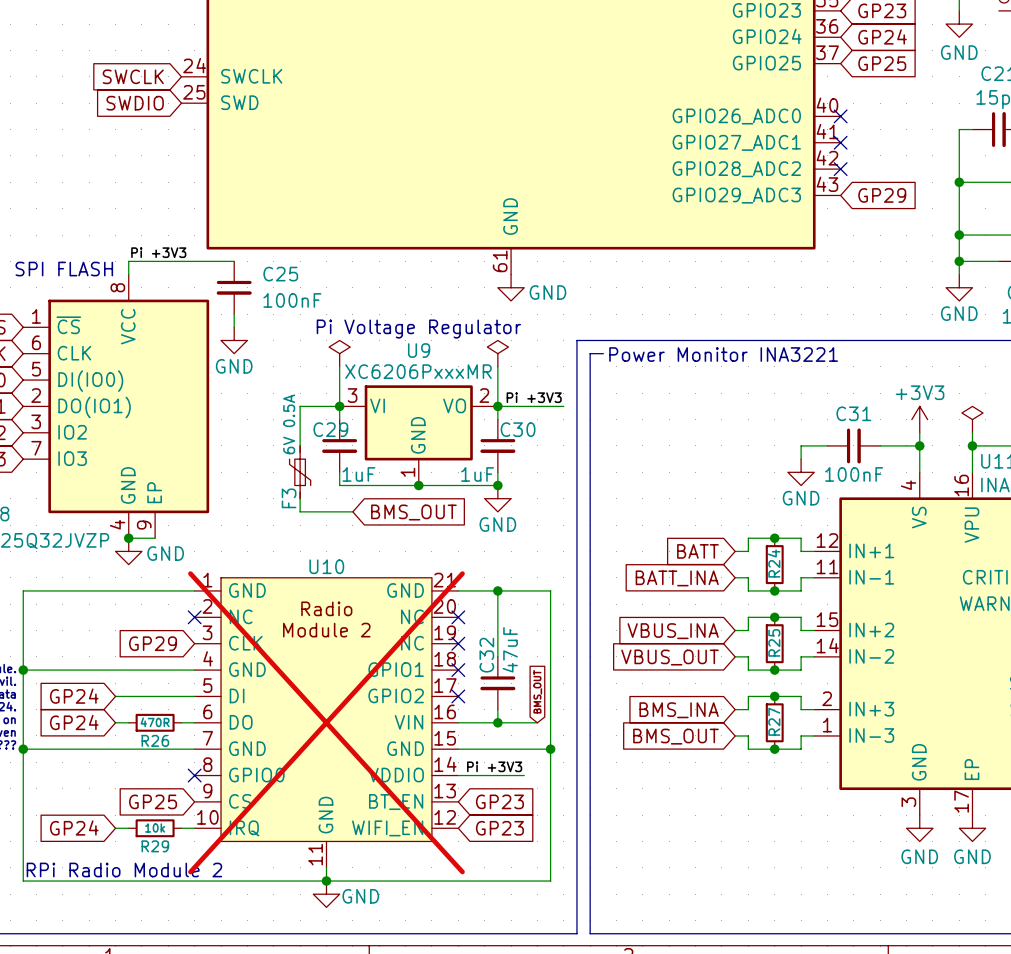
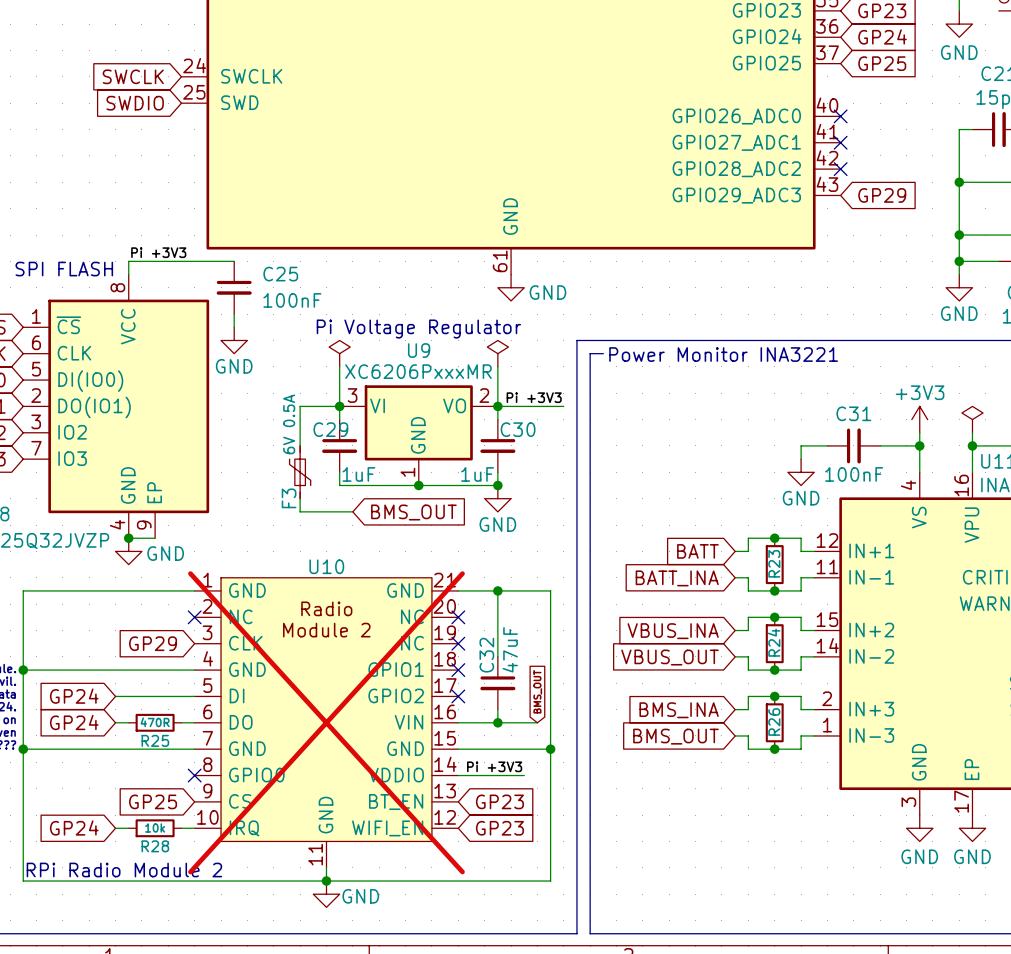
R24 name: R24 (774, 563) -> R23 (774, 563)
R25 name: R25 (774, 642) -> R24 (774, 642)
R27 name: R27 (774, 721) -> R26 (774, 722)
R26 name: R26 (155, 740) -> R25 (155, 740)
R29 name: R29 (155, 846) -> R28 (155, 846)

